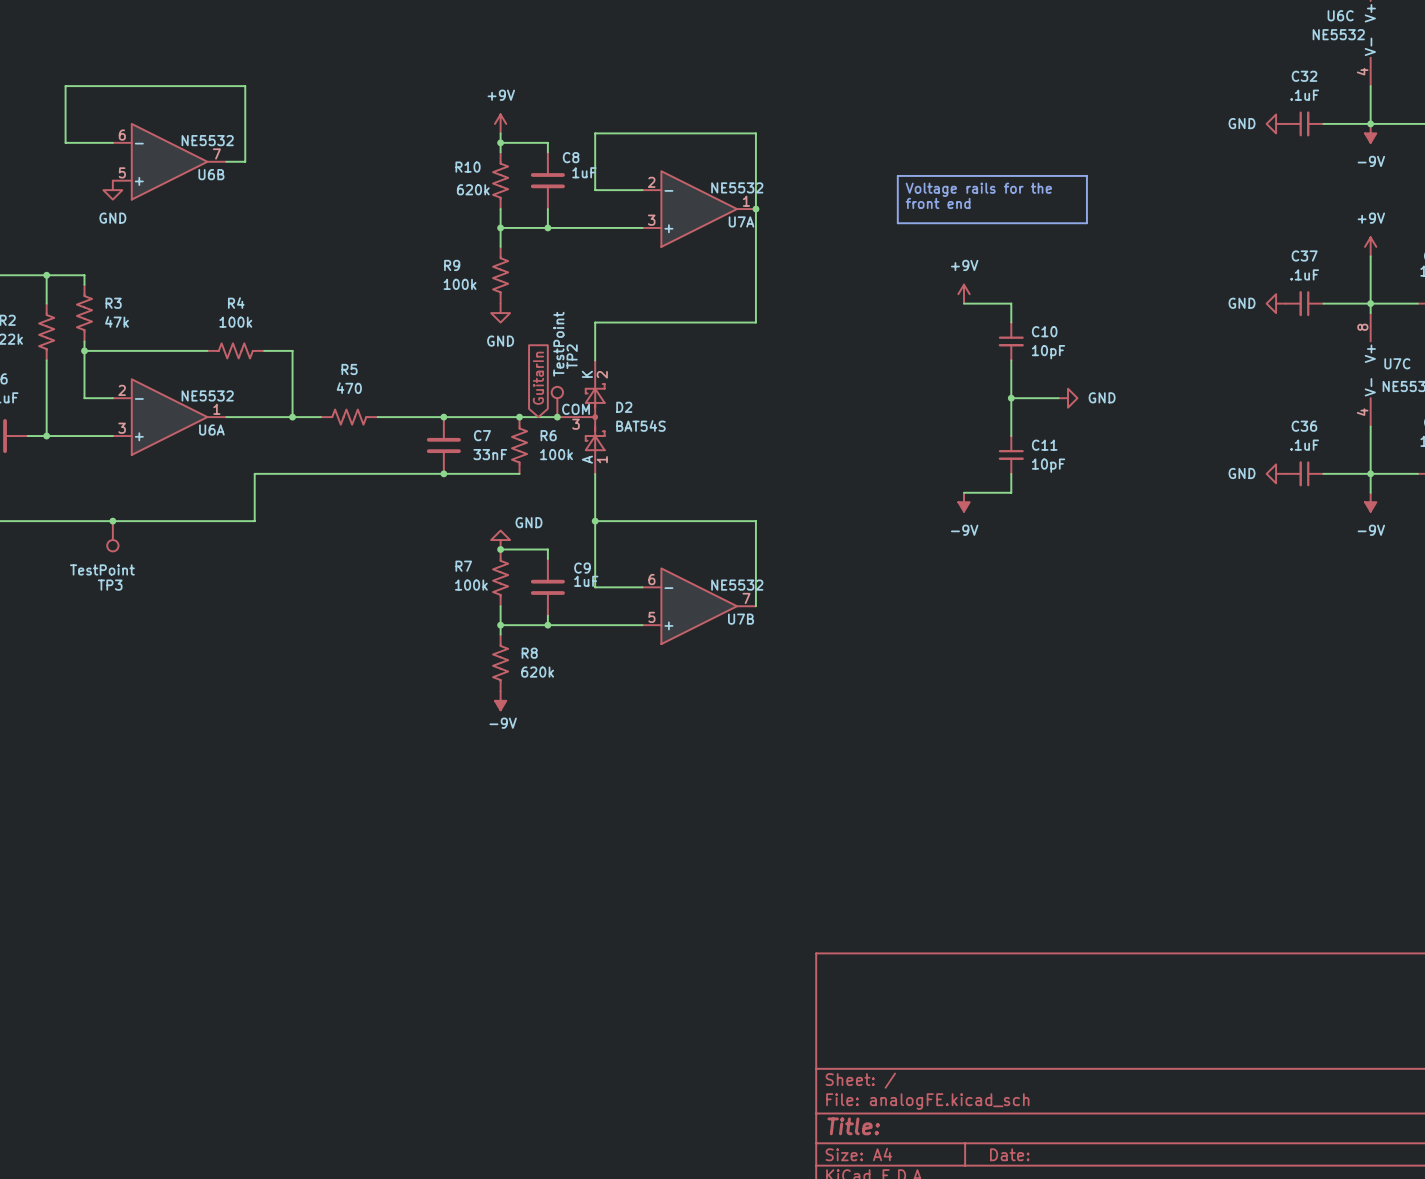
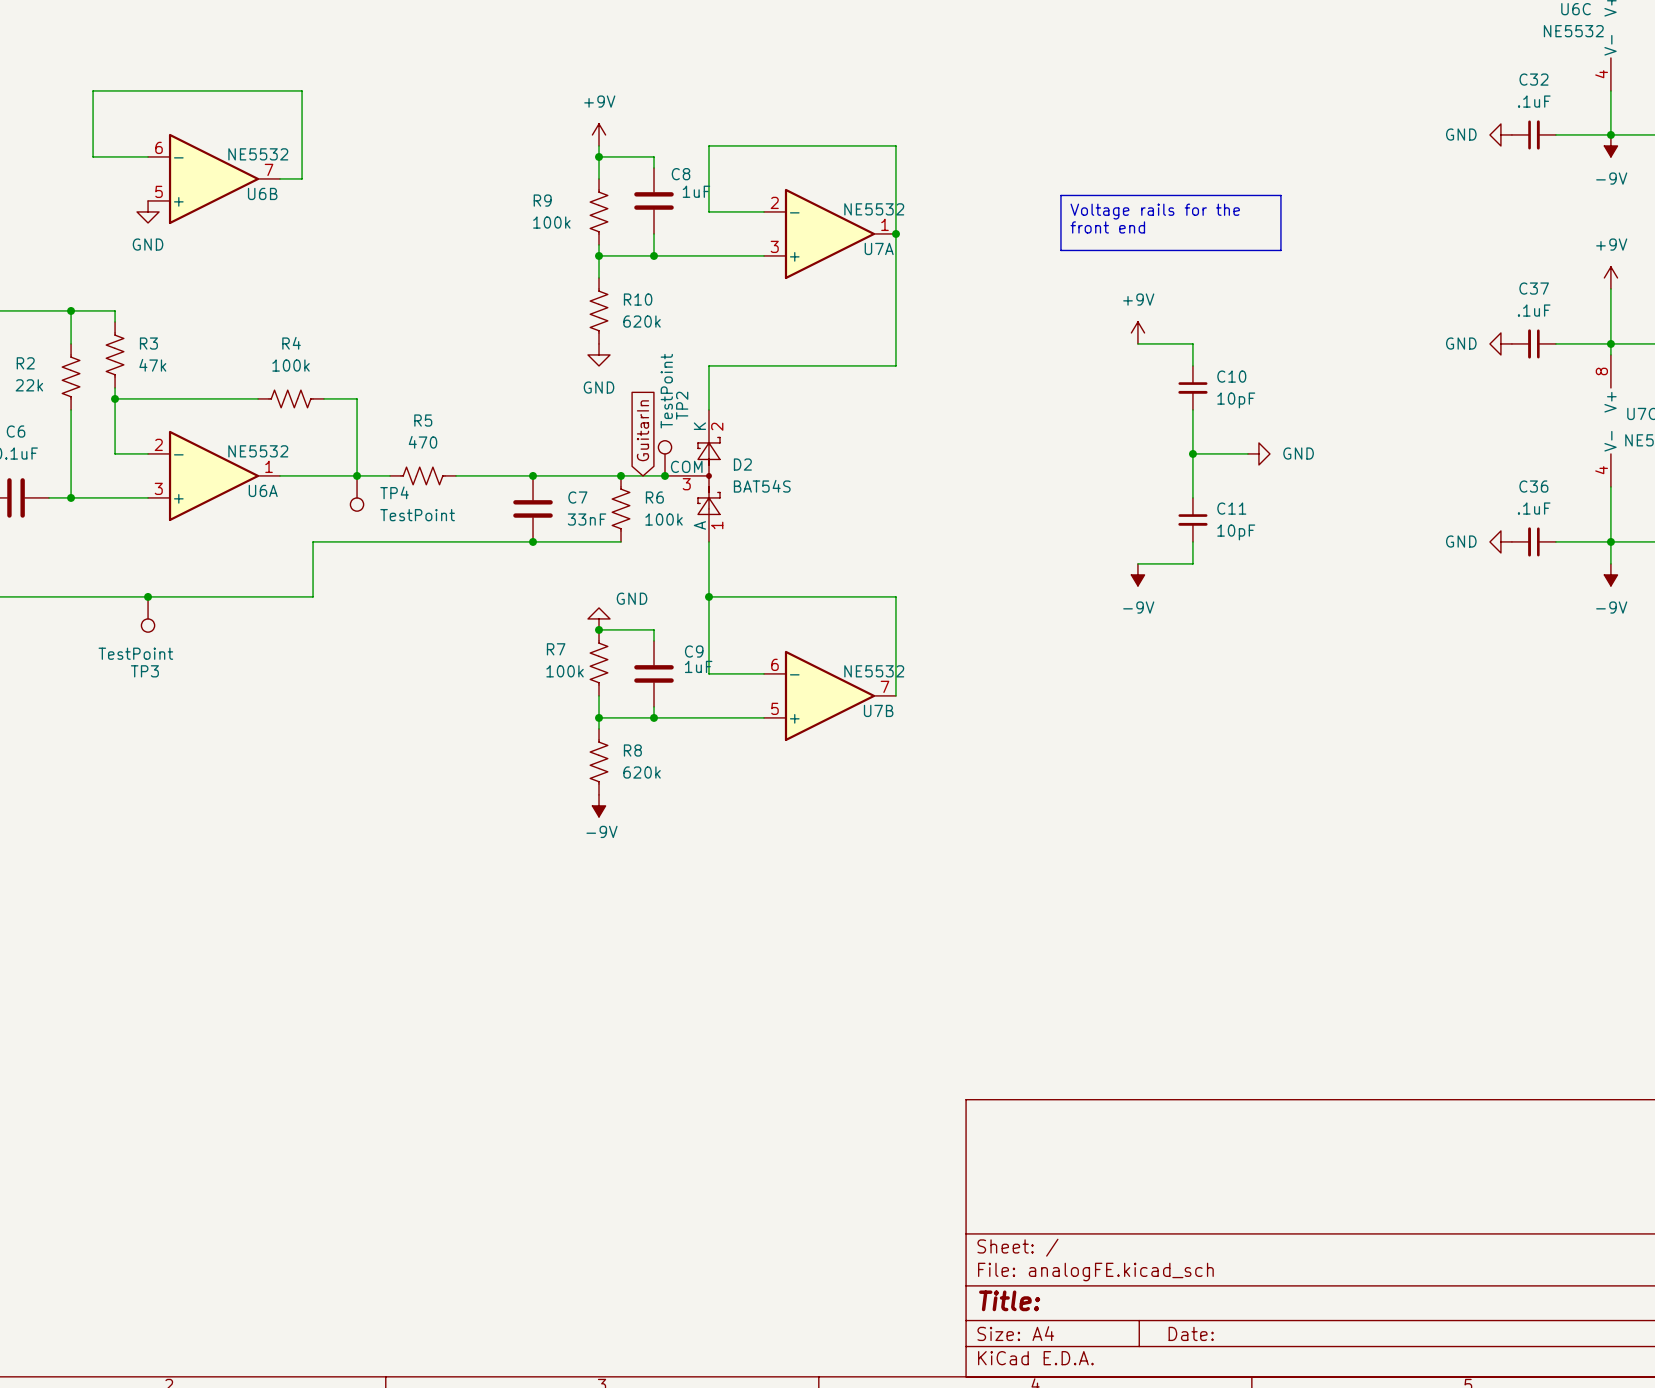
R10: 620k (500, 180) -> none
R9: none -> 100k (599, 211)
R9 name: R9 (452, 265) -> R10 (638, 299)
R9 value: 100k (460, 284) -> 620k (642, 321)
TP4: none -> TestPoint (357, 493)

